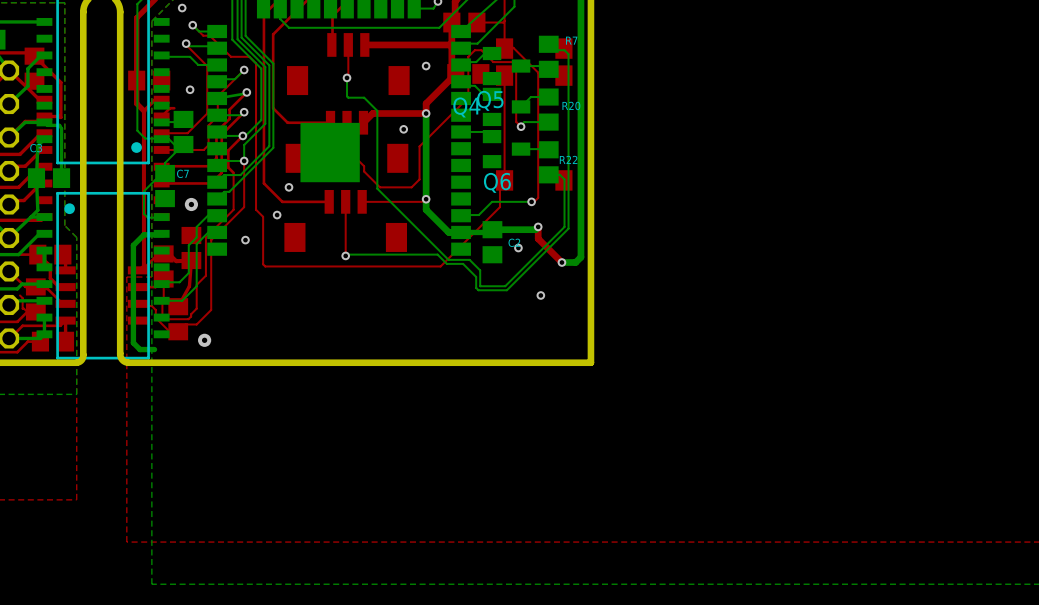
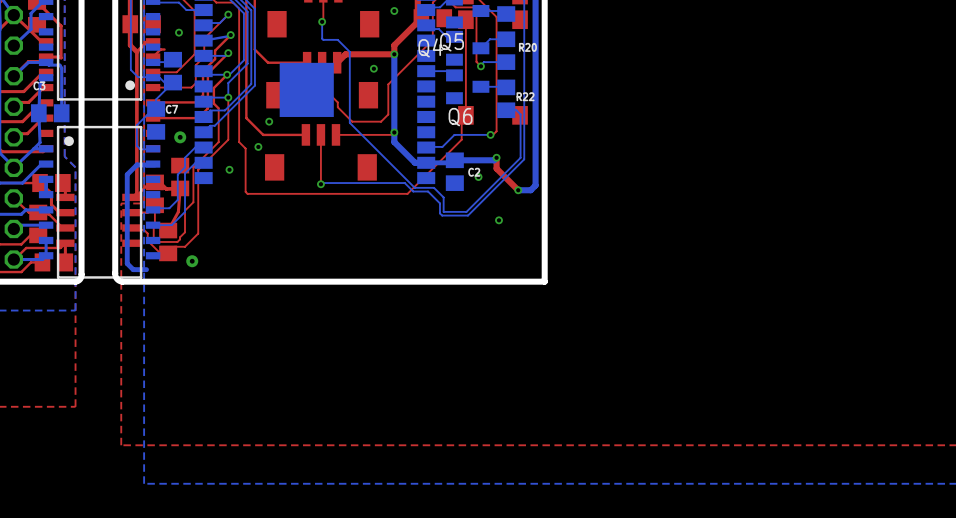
top track: (20, 295) (22, 298) (22, 308) (27, 311) -> none

